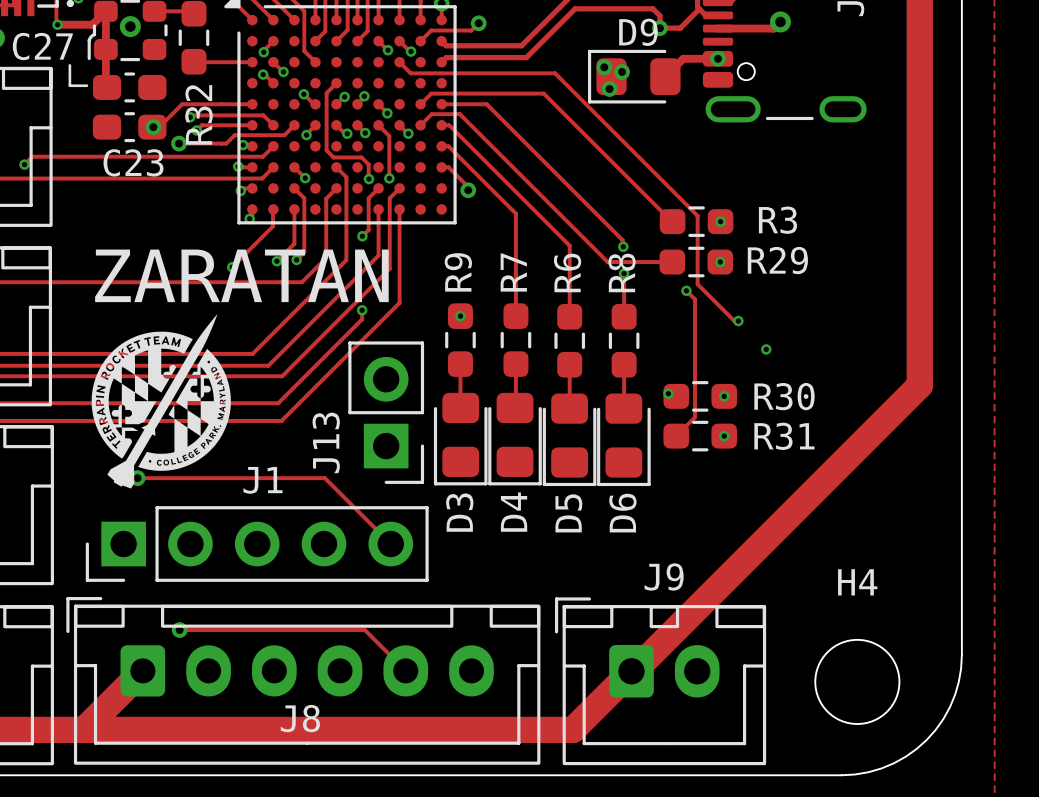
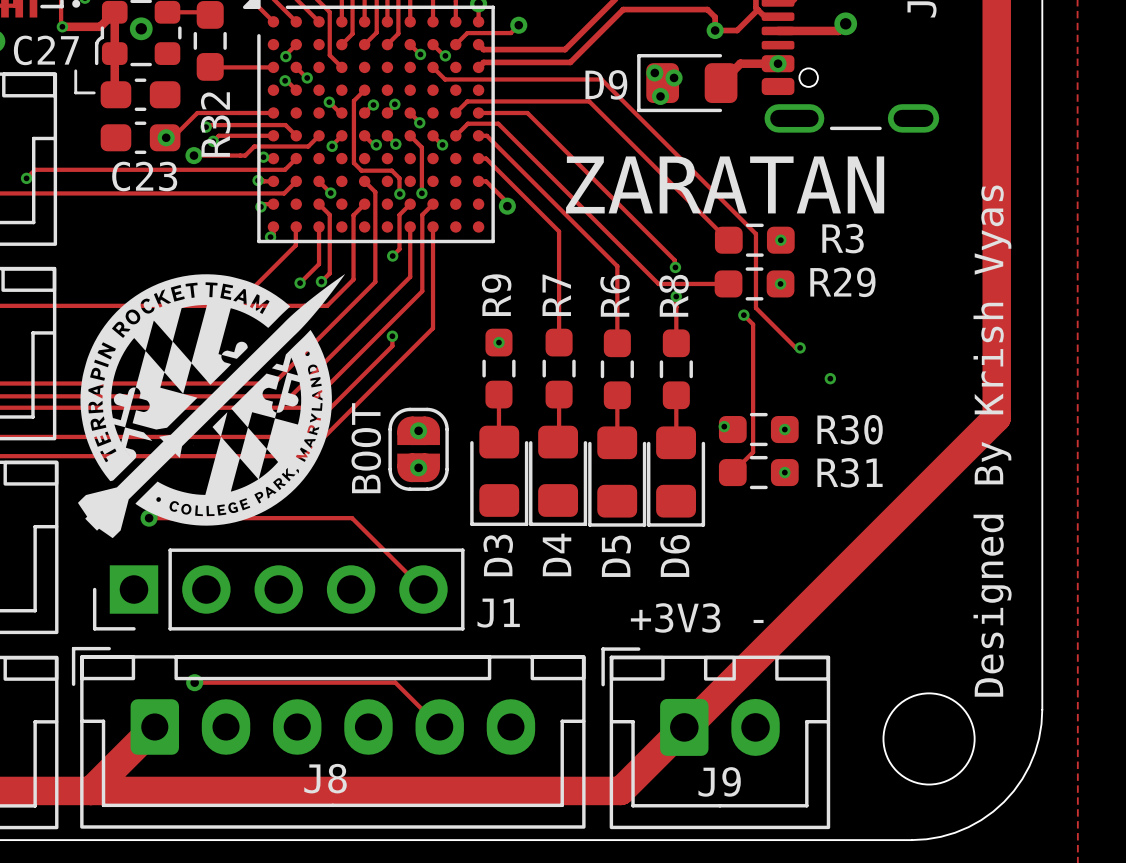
D9 name position: D9 (638, 32) -> D9 (606, 84)
drawing: none -> [78, 274, 346, 539]
text position: ZARATAN (241, 275) -> ZARATAN (725, 184)
drawing: [91, 313, 231, 489] -> none
via: none -> (418, 430)
text: none -> Designed By Krish Vyas (992, 441)
J13: (386, 412) -> none
BOOT: none -> (418, 449)
via: none -> (418, 467)
J1 name position: J1 (263, 480) -> J1 (498, 613)
text: none -> +3V3 - (697, 617)
J9 name position: J9 (664, 576) -> J9 (719, 781)
H4 name: H4 (857, 582) -> none

